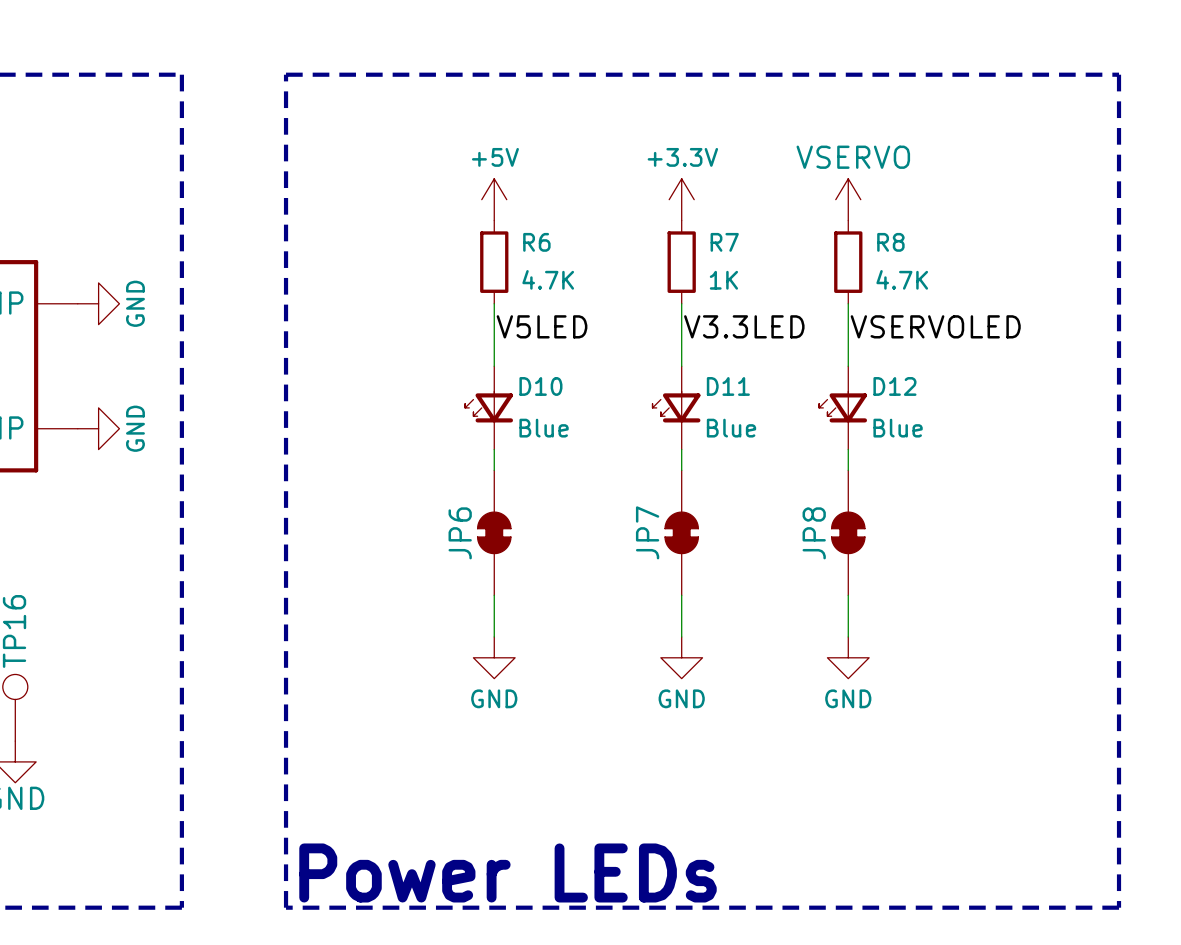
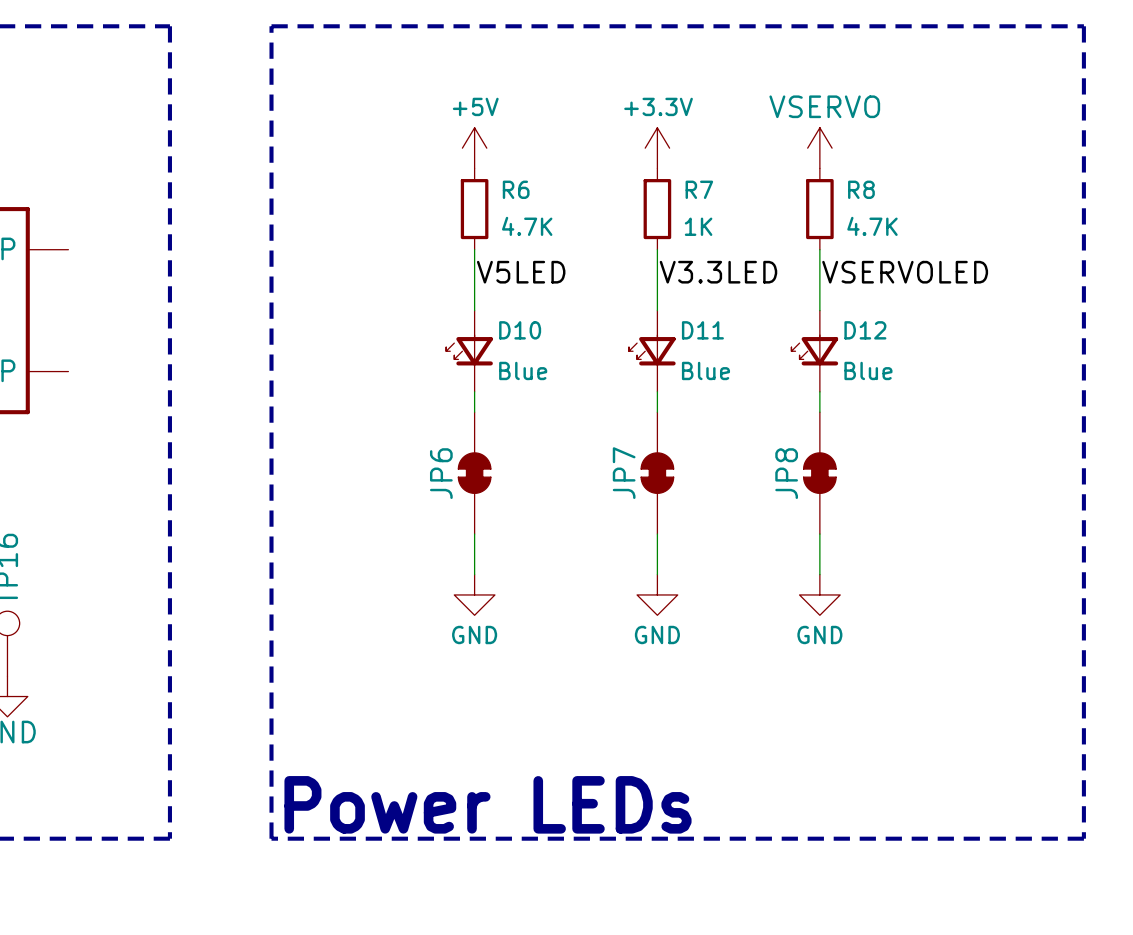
power symbol: GND (98, 303) -> none
power symbol: GND (98, 428) -> none

